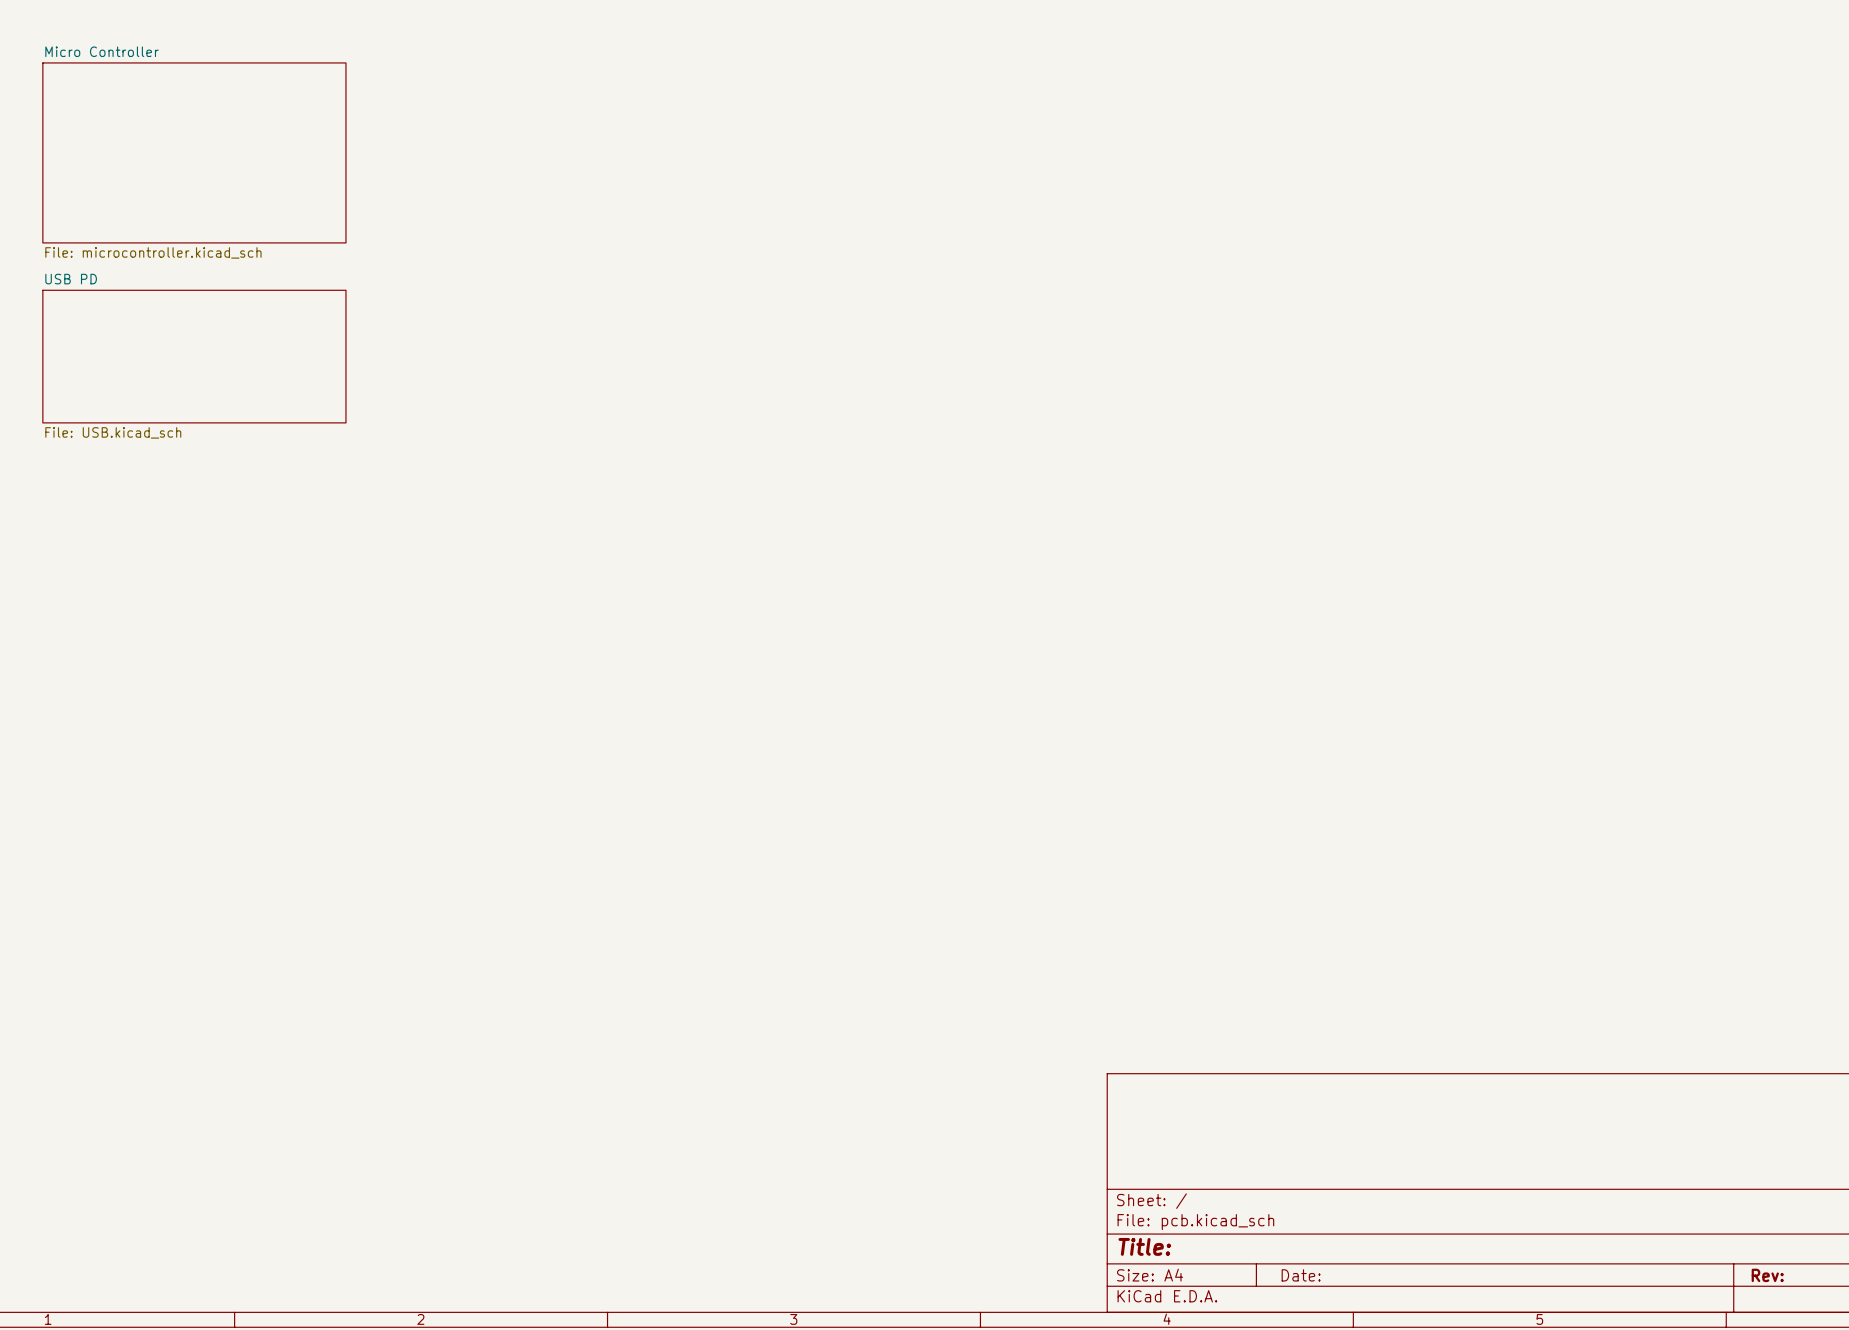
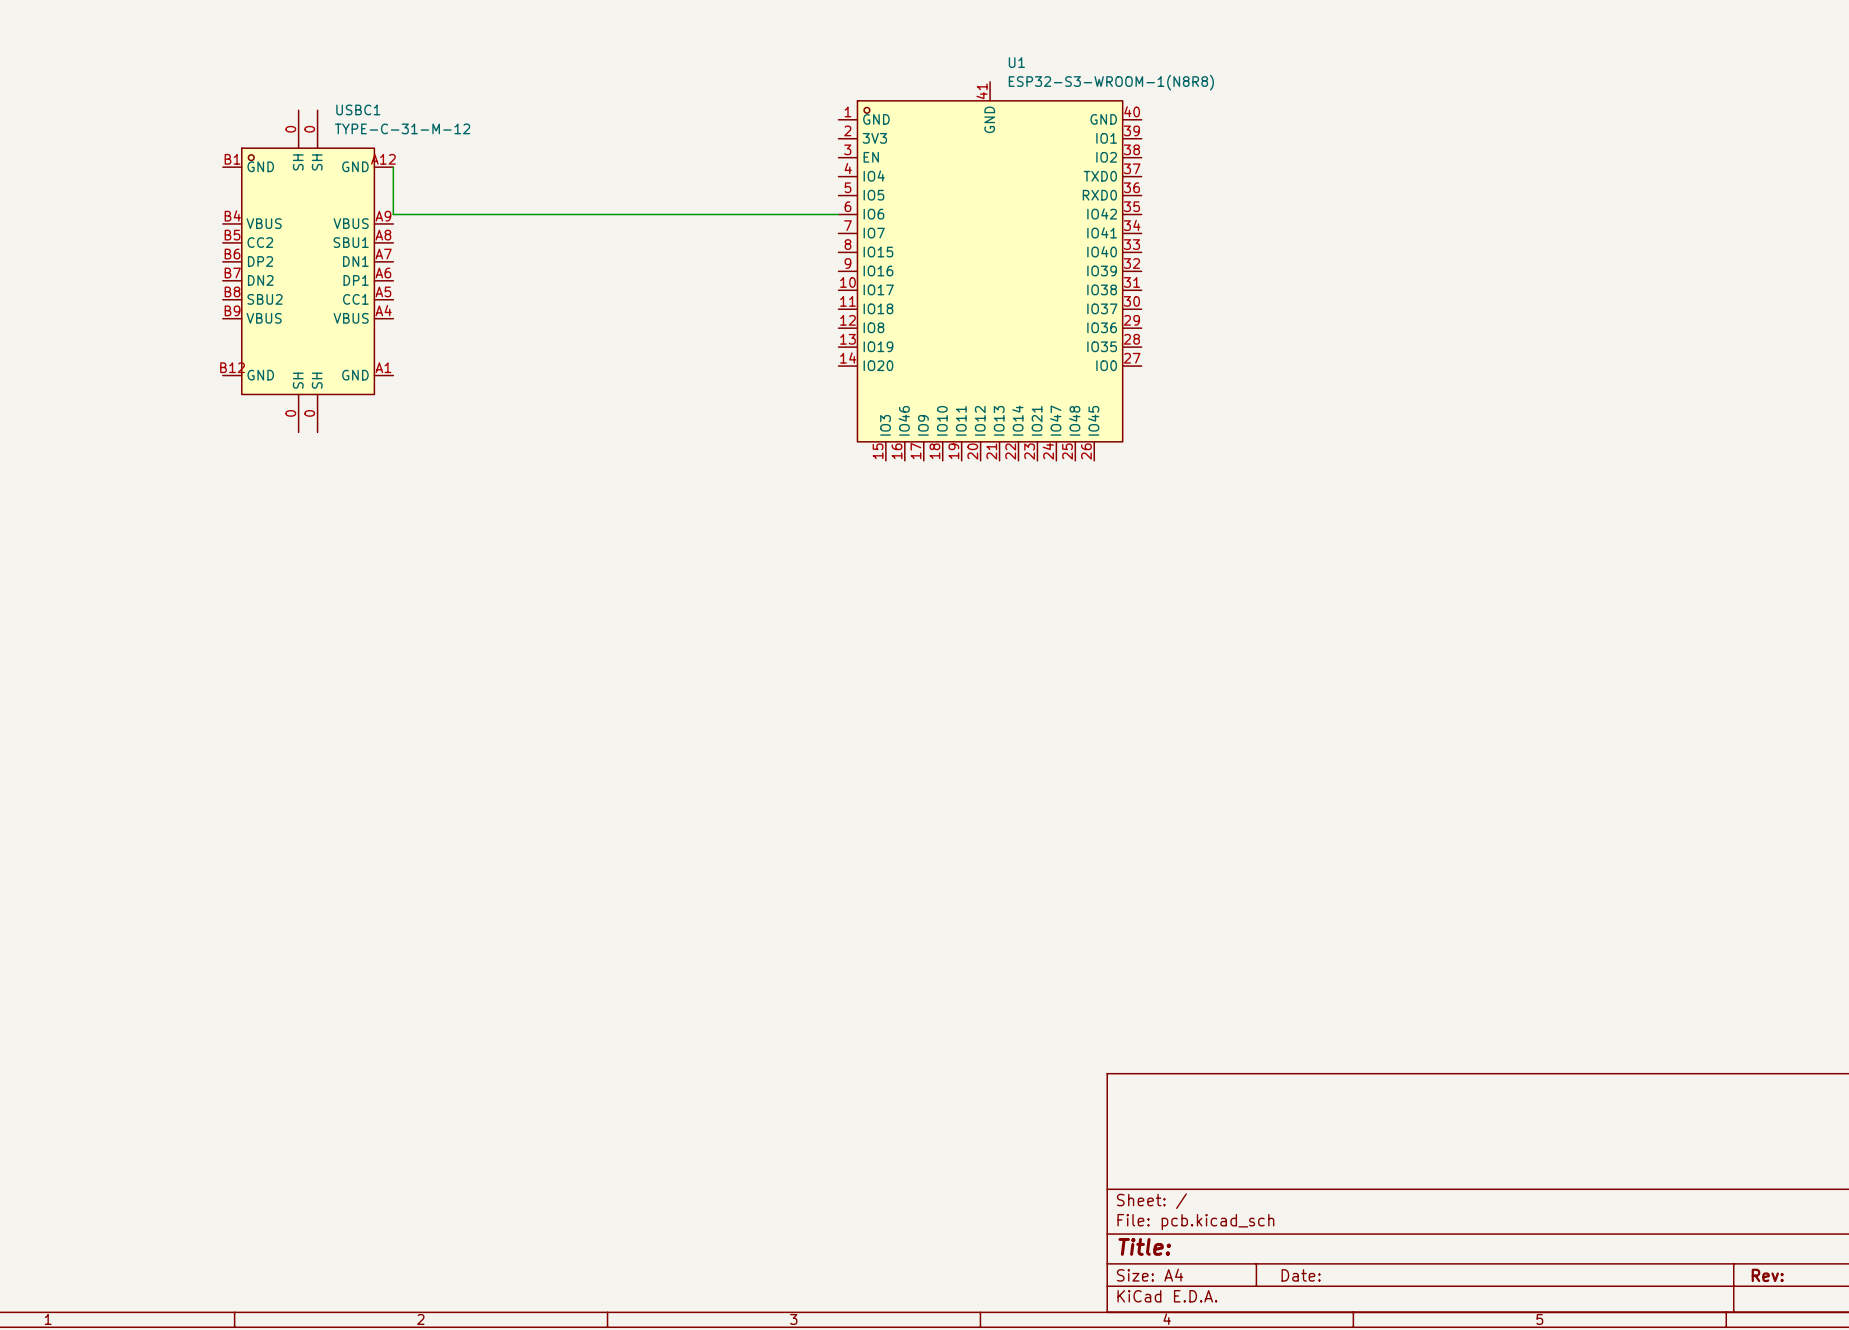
sheet Micro Controller: File: microcontroller.kicad_sch (194, 152) -> none
wire: none -> (393, 167) (393, 214) (838, 214)
USBC1: none -> TYPE-C-31-M-12 (308, 271)
U1: none -> ESP32-S3-WROOM-1(N8R8) (990, 271)
sheet USB PD: File: USB.kicad_sch (194, 356) -> none

